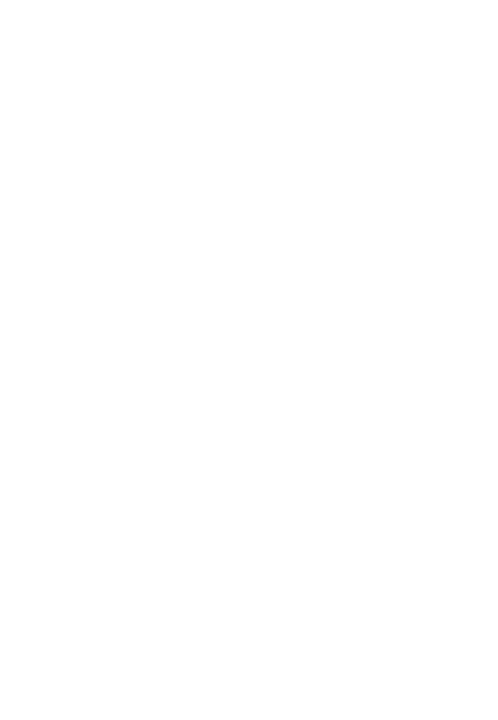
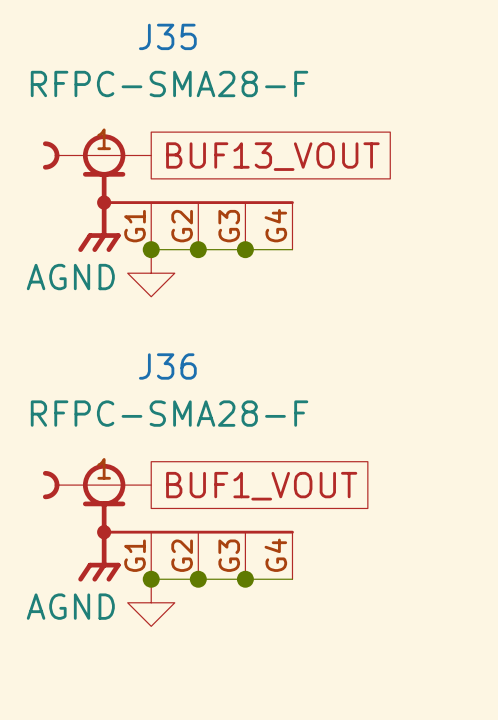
global label: none -> BUF13_VOUT (272, 156)
J35: none -> RFPC-SMA28-F (168, 193)
wire: none -> (151, 249) (292, 249)
junction: none -> (151, 249)
junction: none -> (198, 249)
junction: none -> (245, 249)
power symbol: none -> AGND (151, 273)
global label: none -> BUF1_VOUT (261, 486)
J36: none -> RFPC-SMA28-F (168, 522)
wire: none -> (151, 579) (292, 579)
junction: none -> (151, 579)
junction: none -> (198, 579)
junction: none -> (245, 579)
power symbol: none -> AGND (151, 602)

